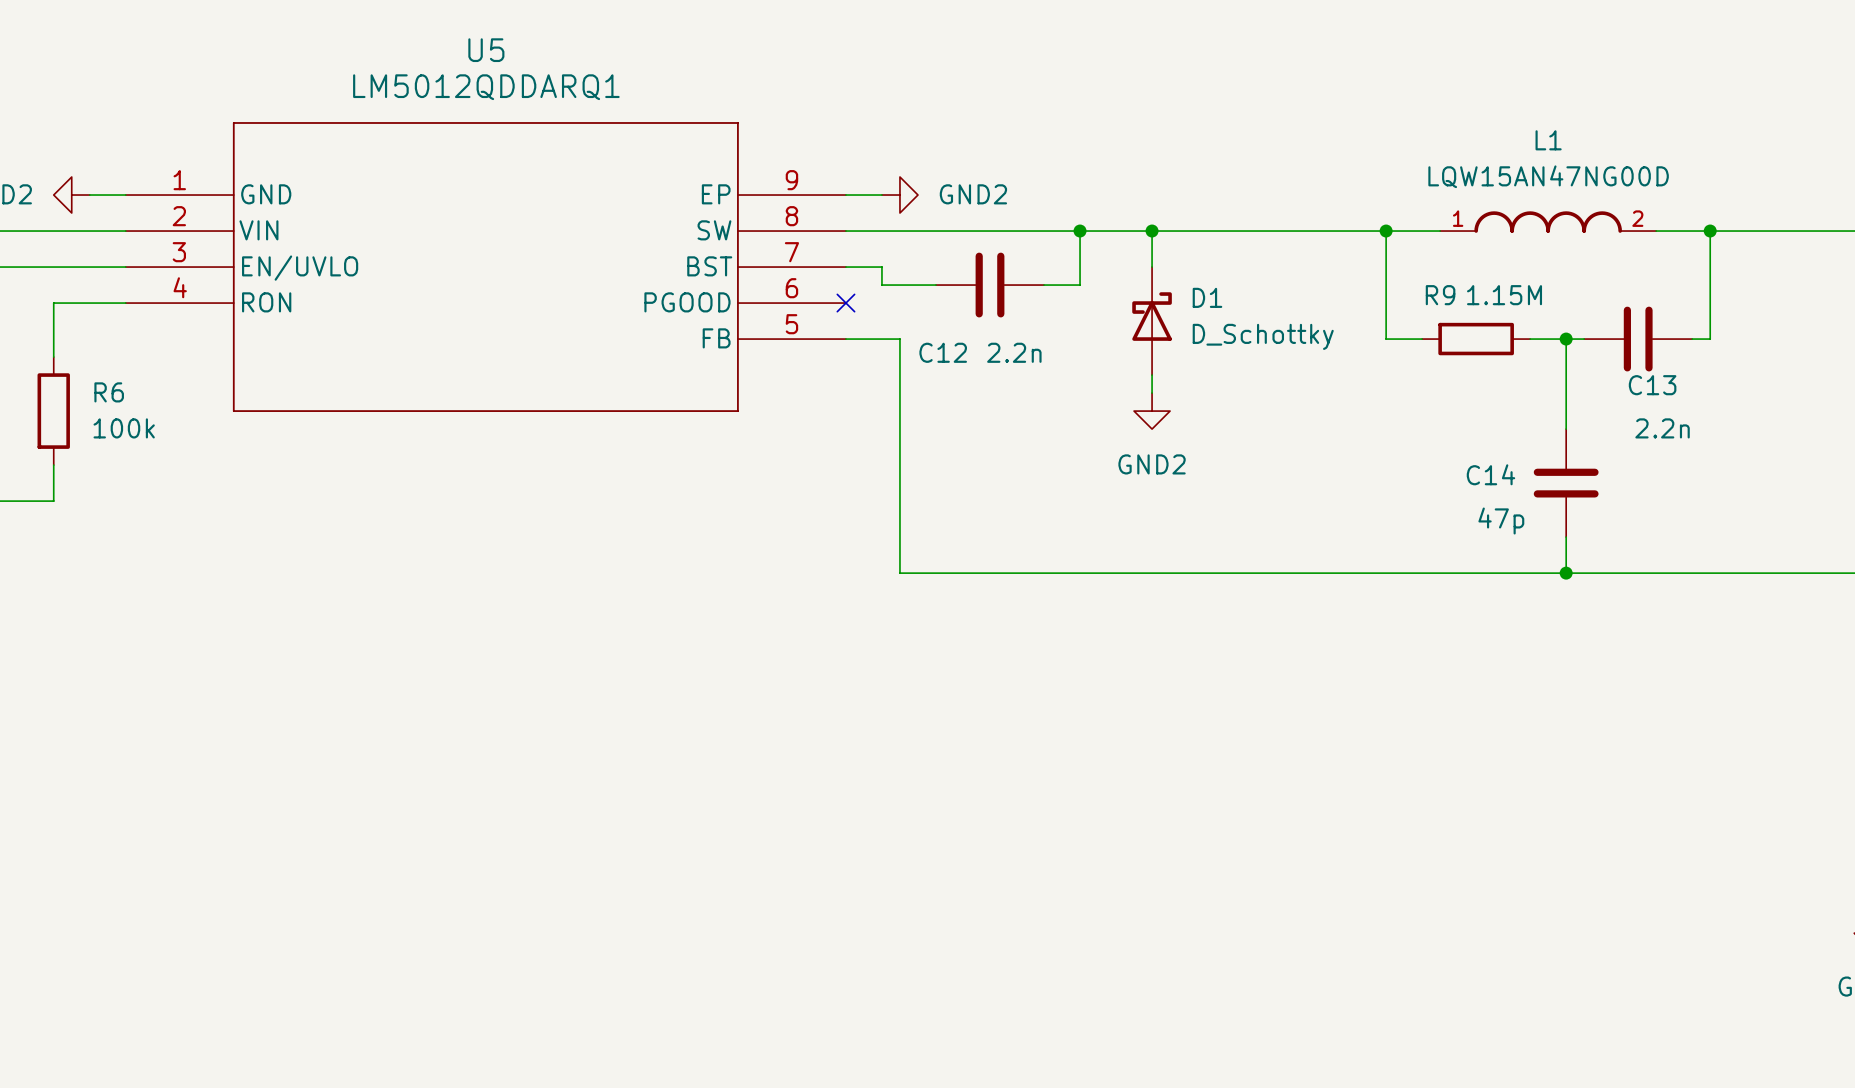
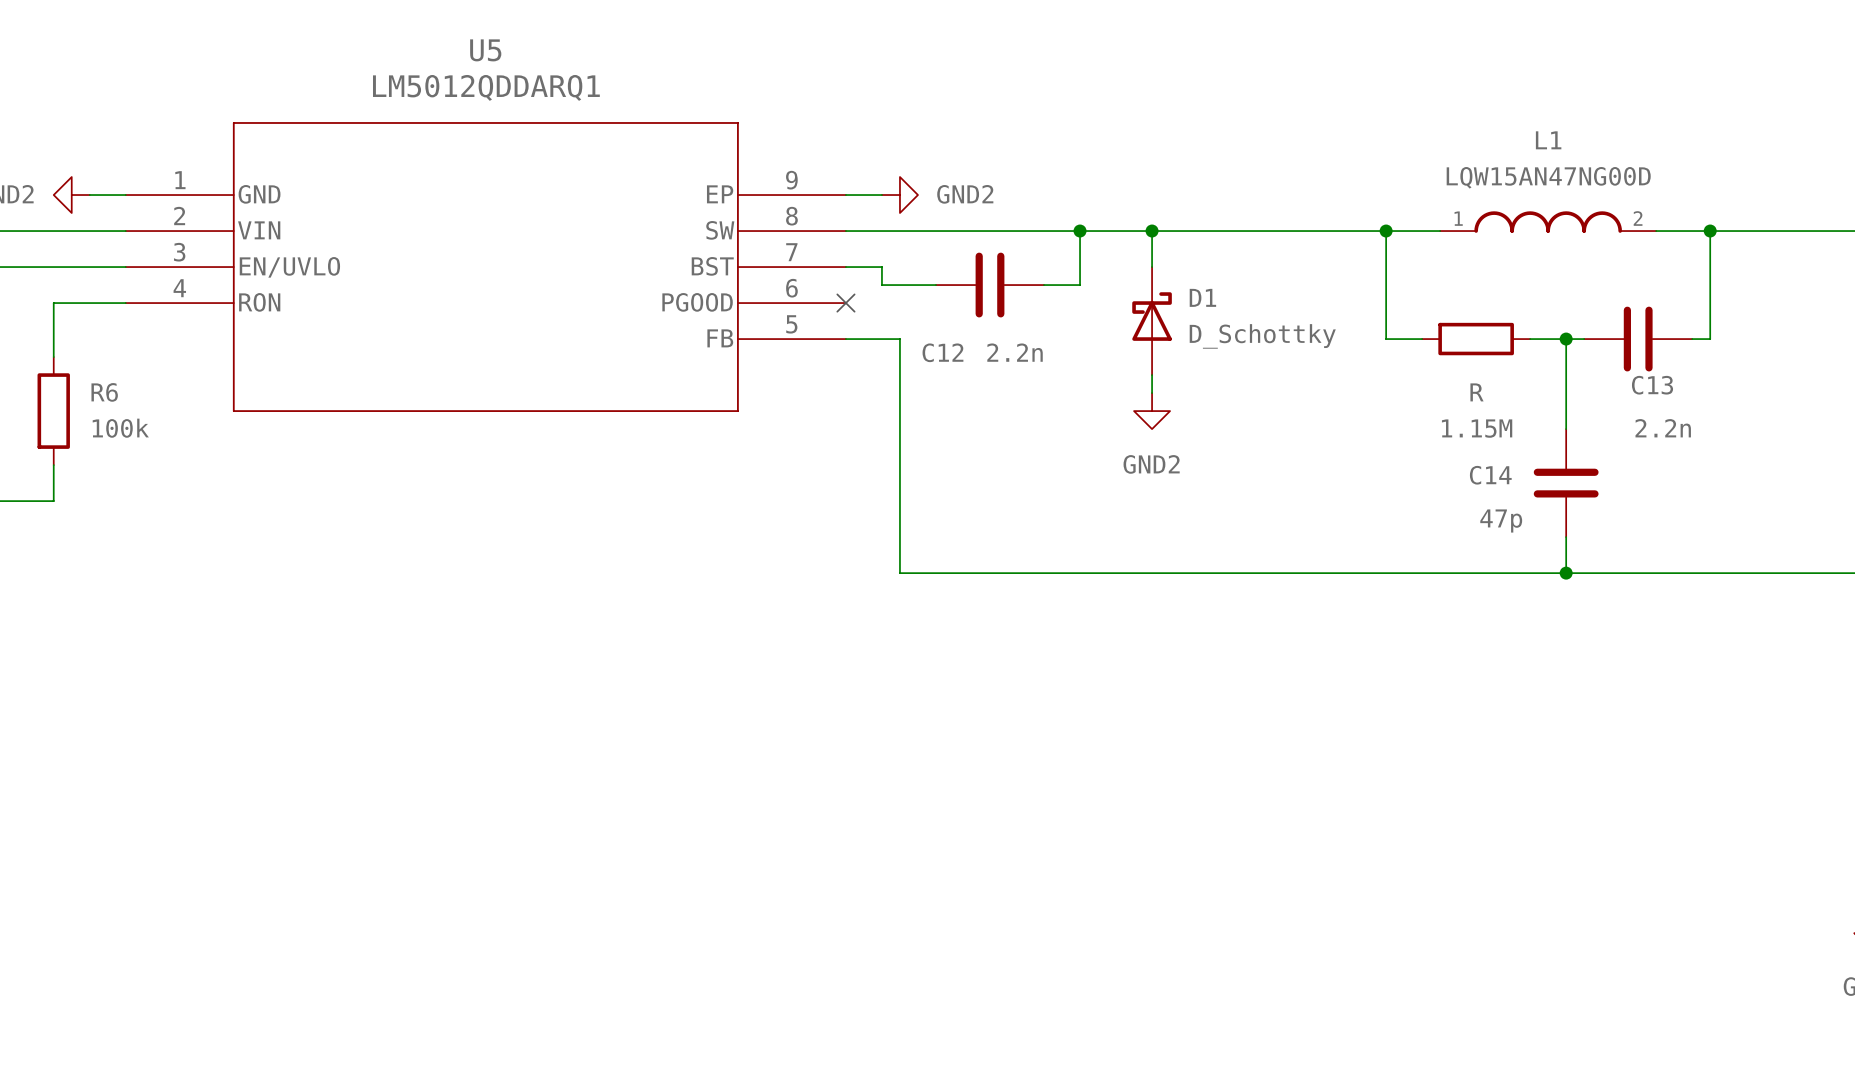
R9 name: R9 (1440, 295) -> 1.15M (1477, 428)
R9 value: 1.15M (1504, 295) -> R (1477, 392)

